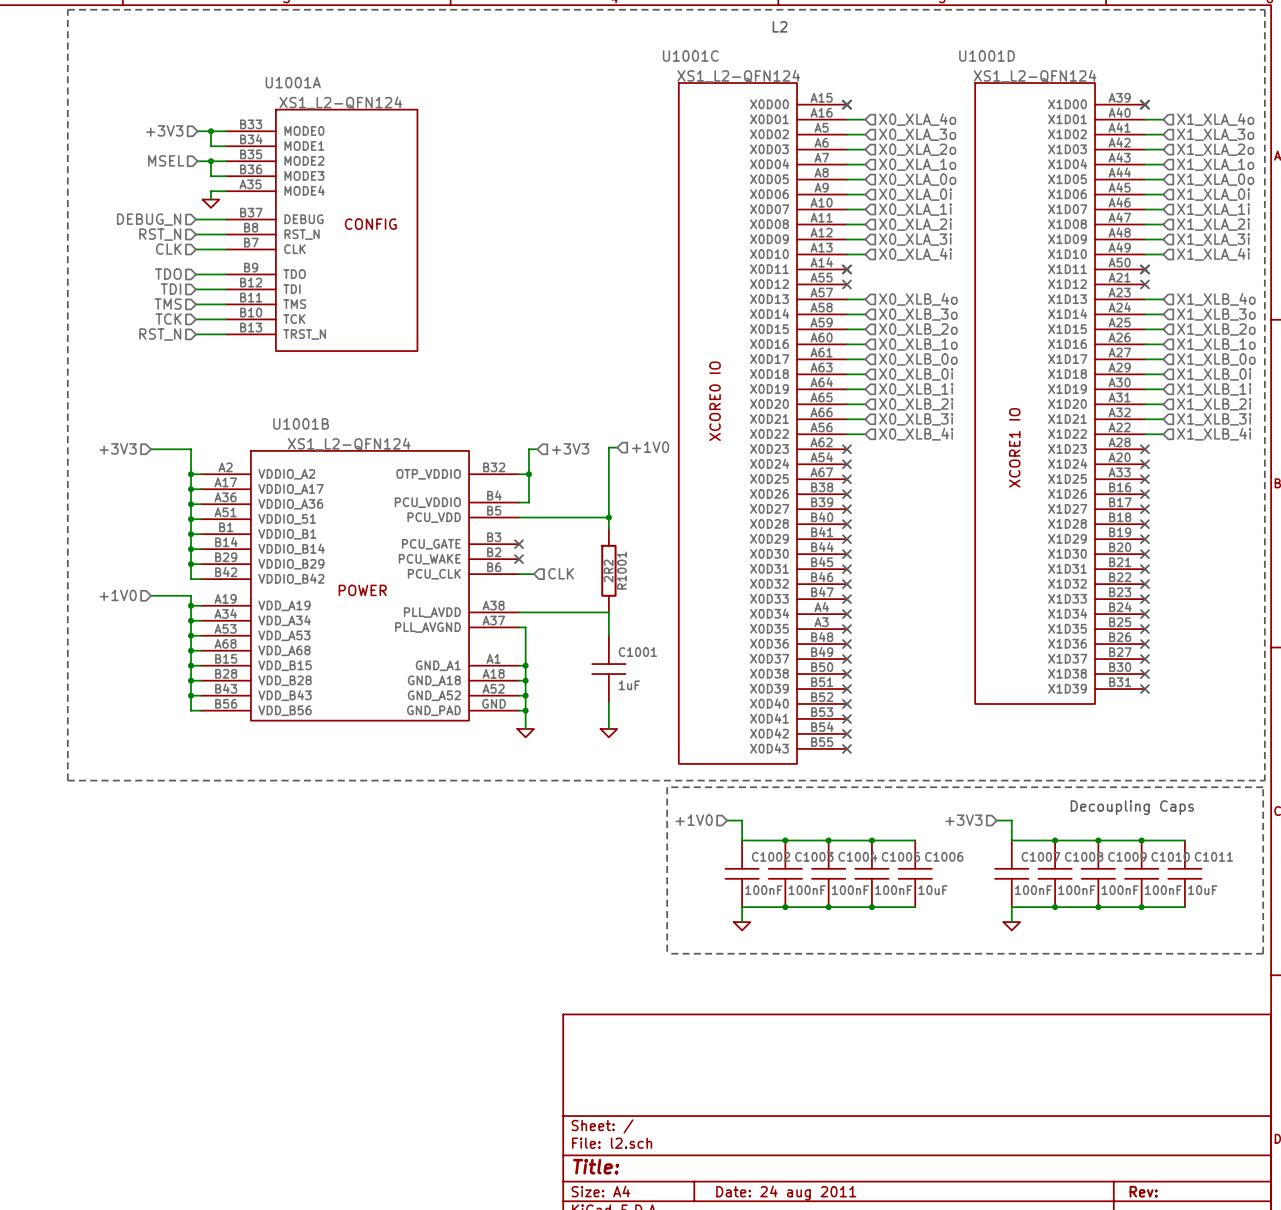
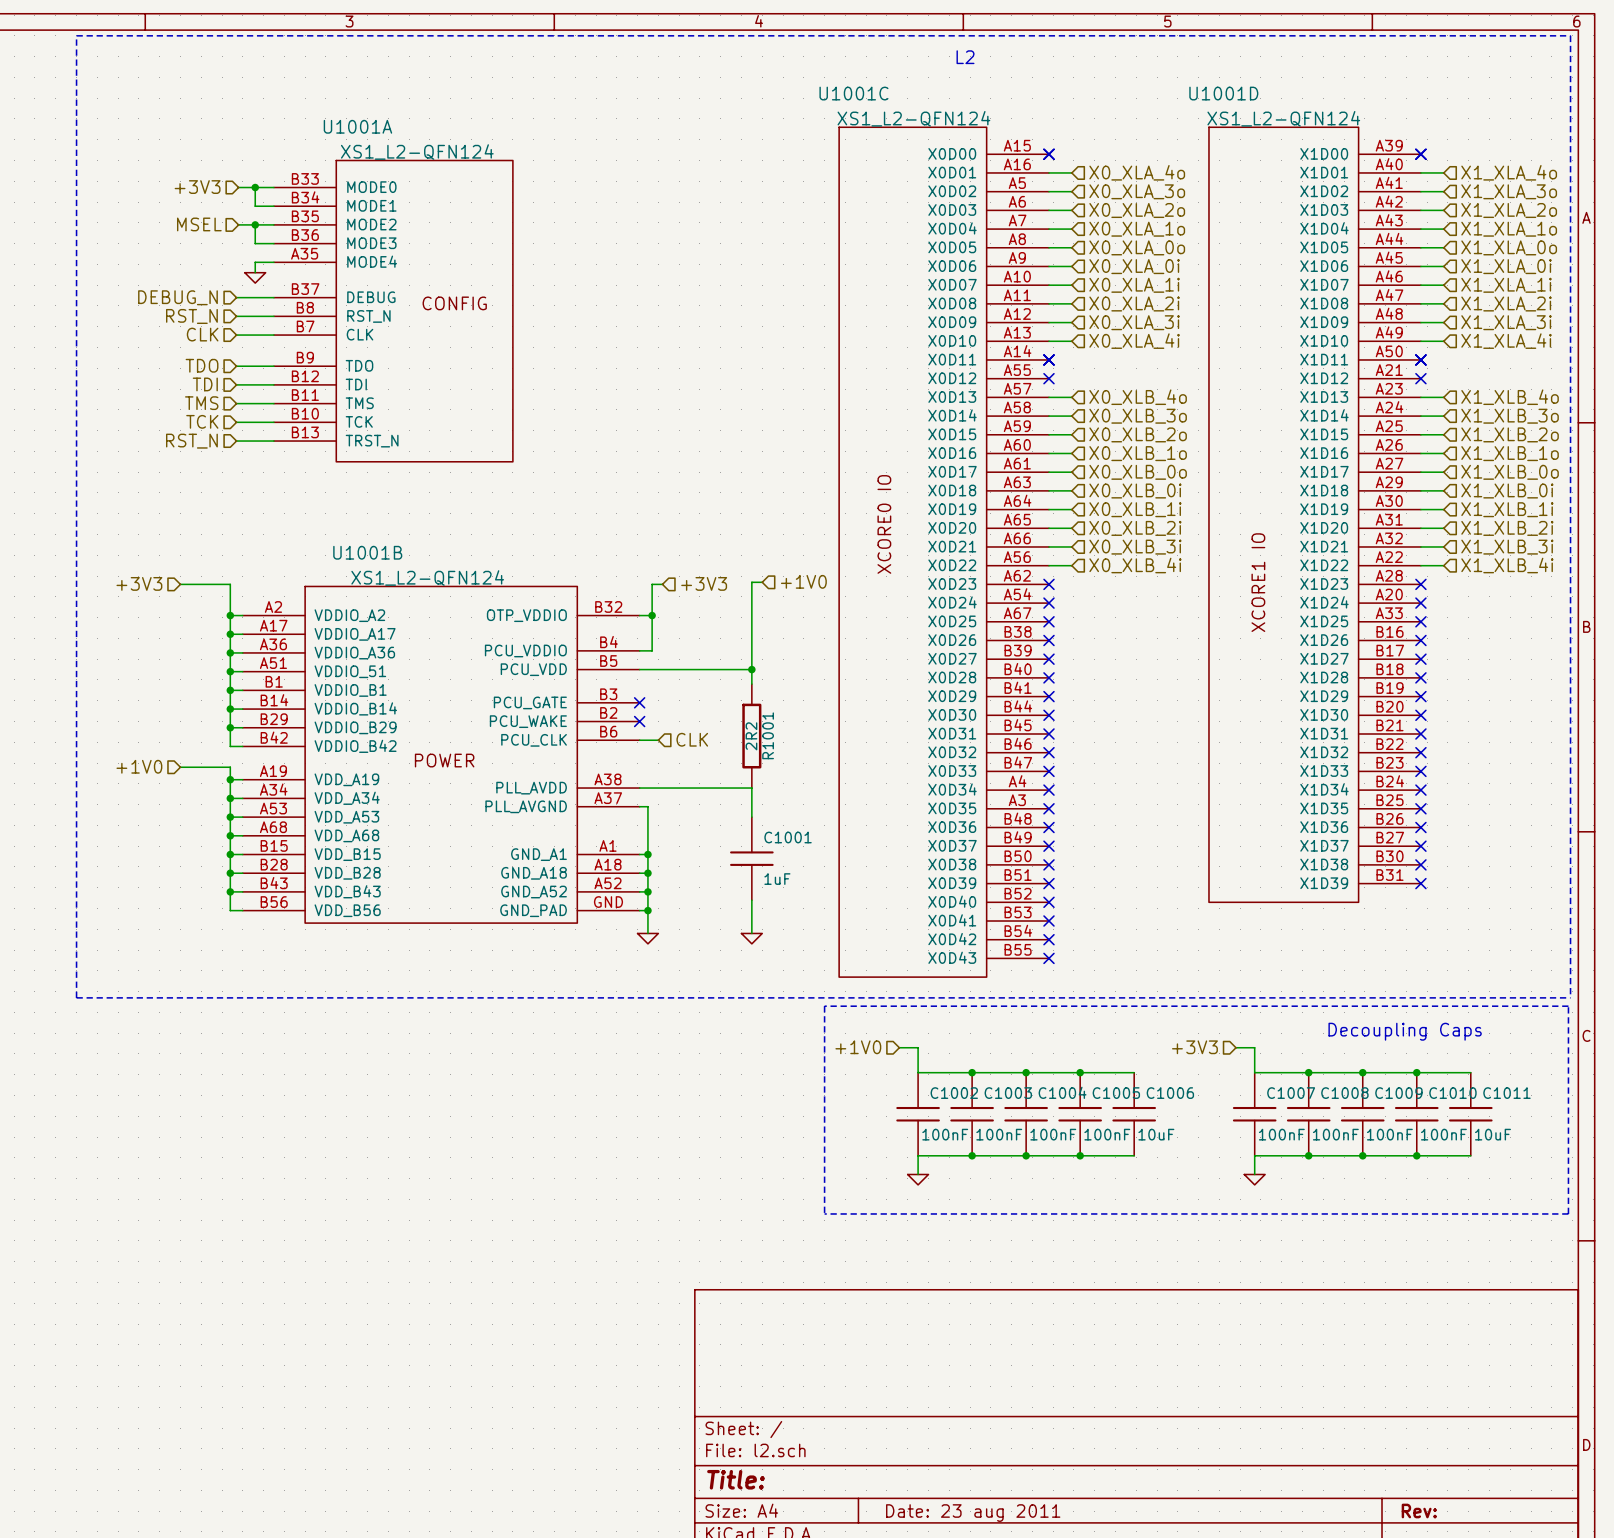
title block: Date: 24 aug 2011 (786, 1193) -> Date: 23 aug 2011 (973, 1513)

